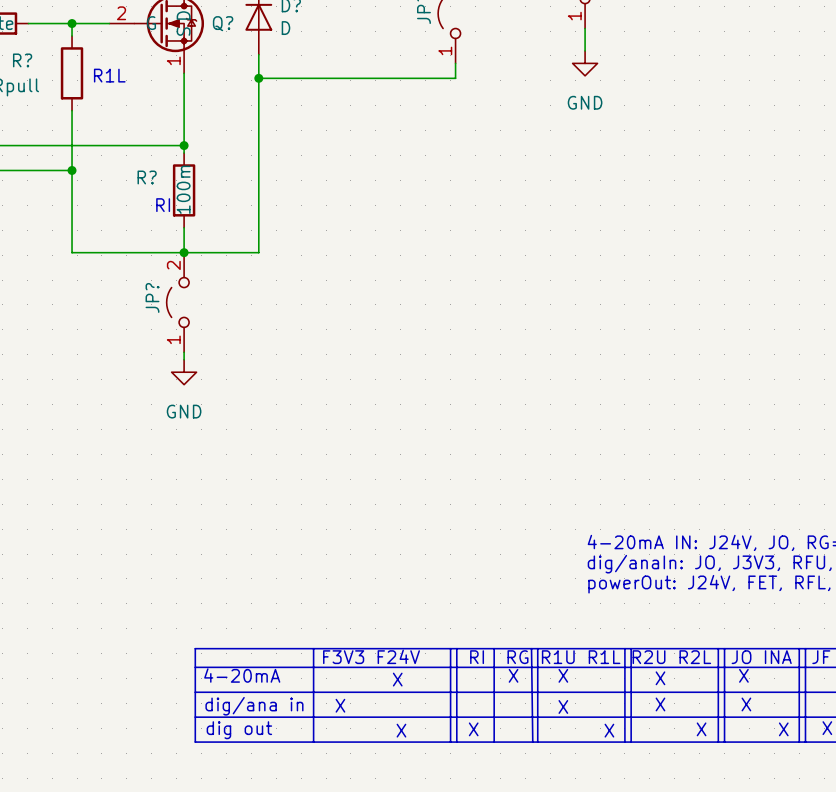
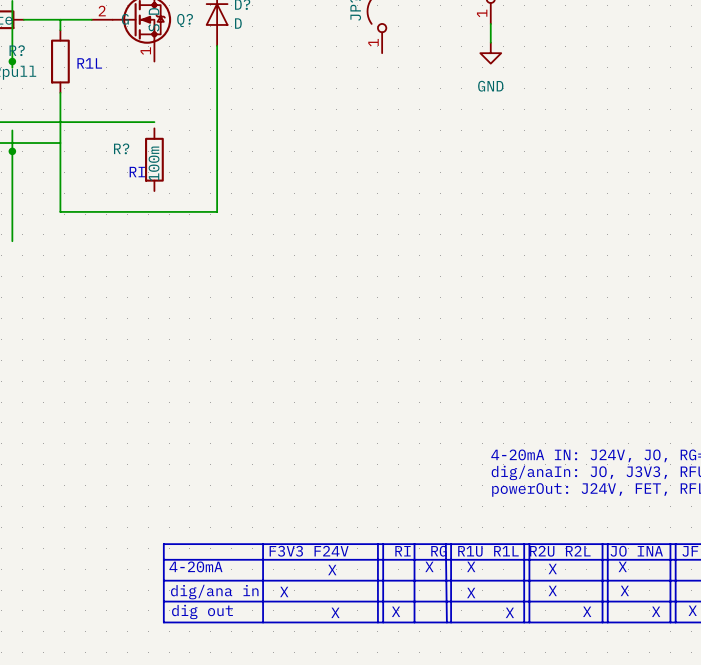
junction: (72, 23) -> none
wire: (455, 63) (455, 78) (258, 78) -> none
junction: none -> (12, 61)
wire: (184, 73) (184, 153) -> (12, 0) (12, 67)
junction: (258, 78) -> none
junction: (184, 145) -> none
wire: none -> (12, 130) (12, 241)
junction: (72, 170) -> none
junction: none -> (12, 151)
wire: (184, 227) (184, 252) -> none
junction: (184, 252) -> none
JP?: (177, 302) -> none
wire: (184, 352) (184, 359) -> none
power symbol: GND (184, 372) -> none

